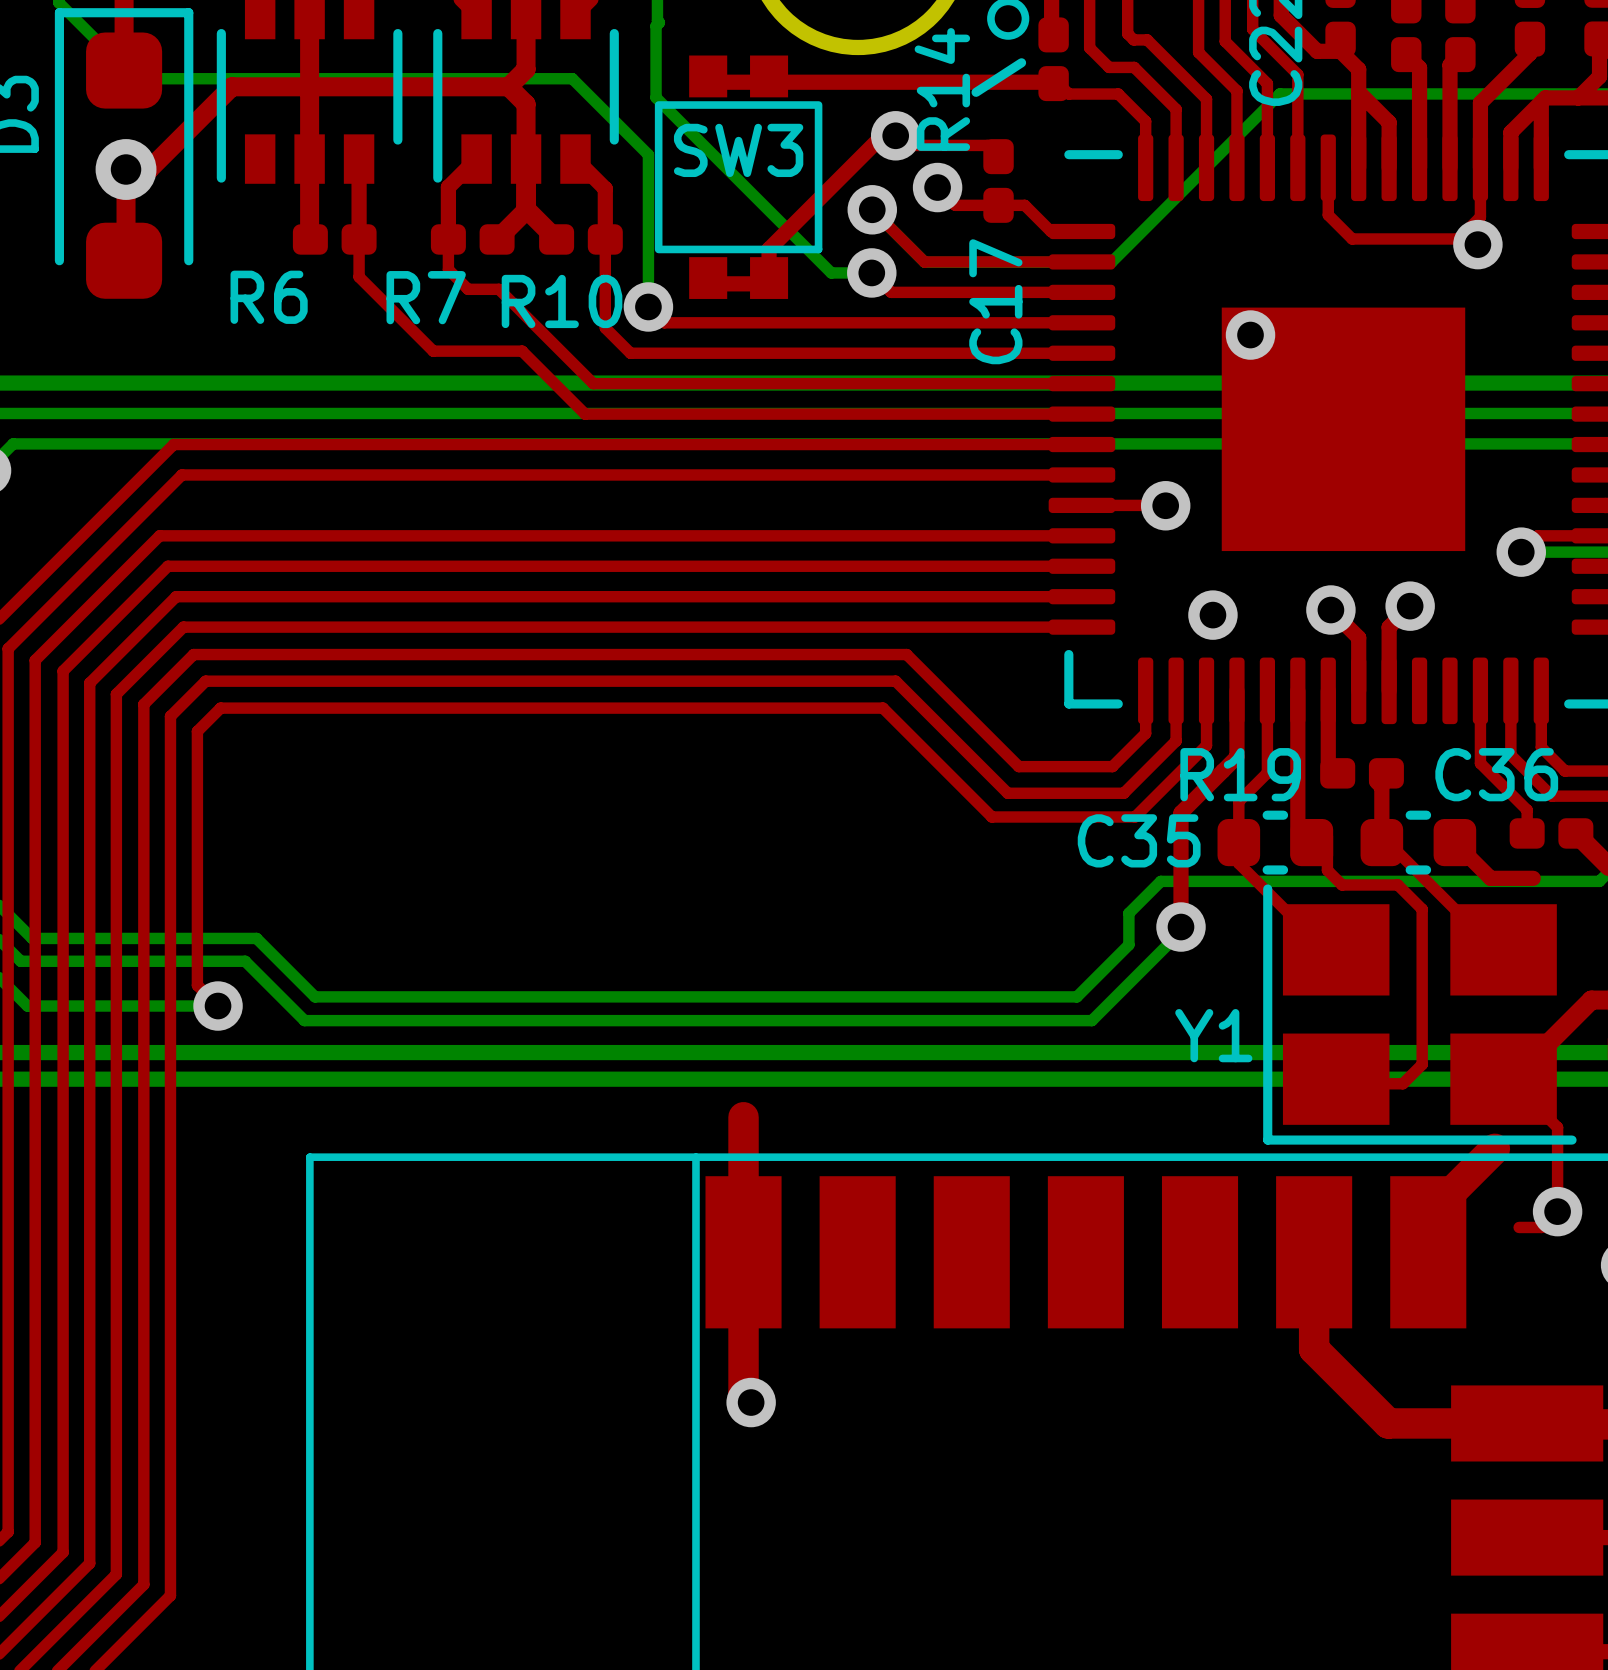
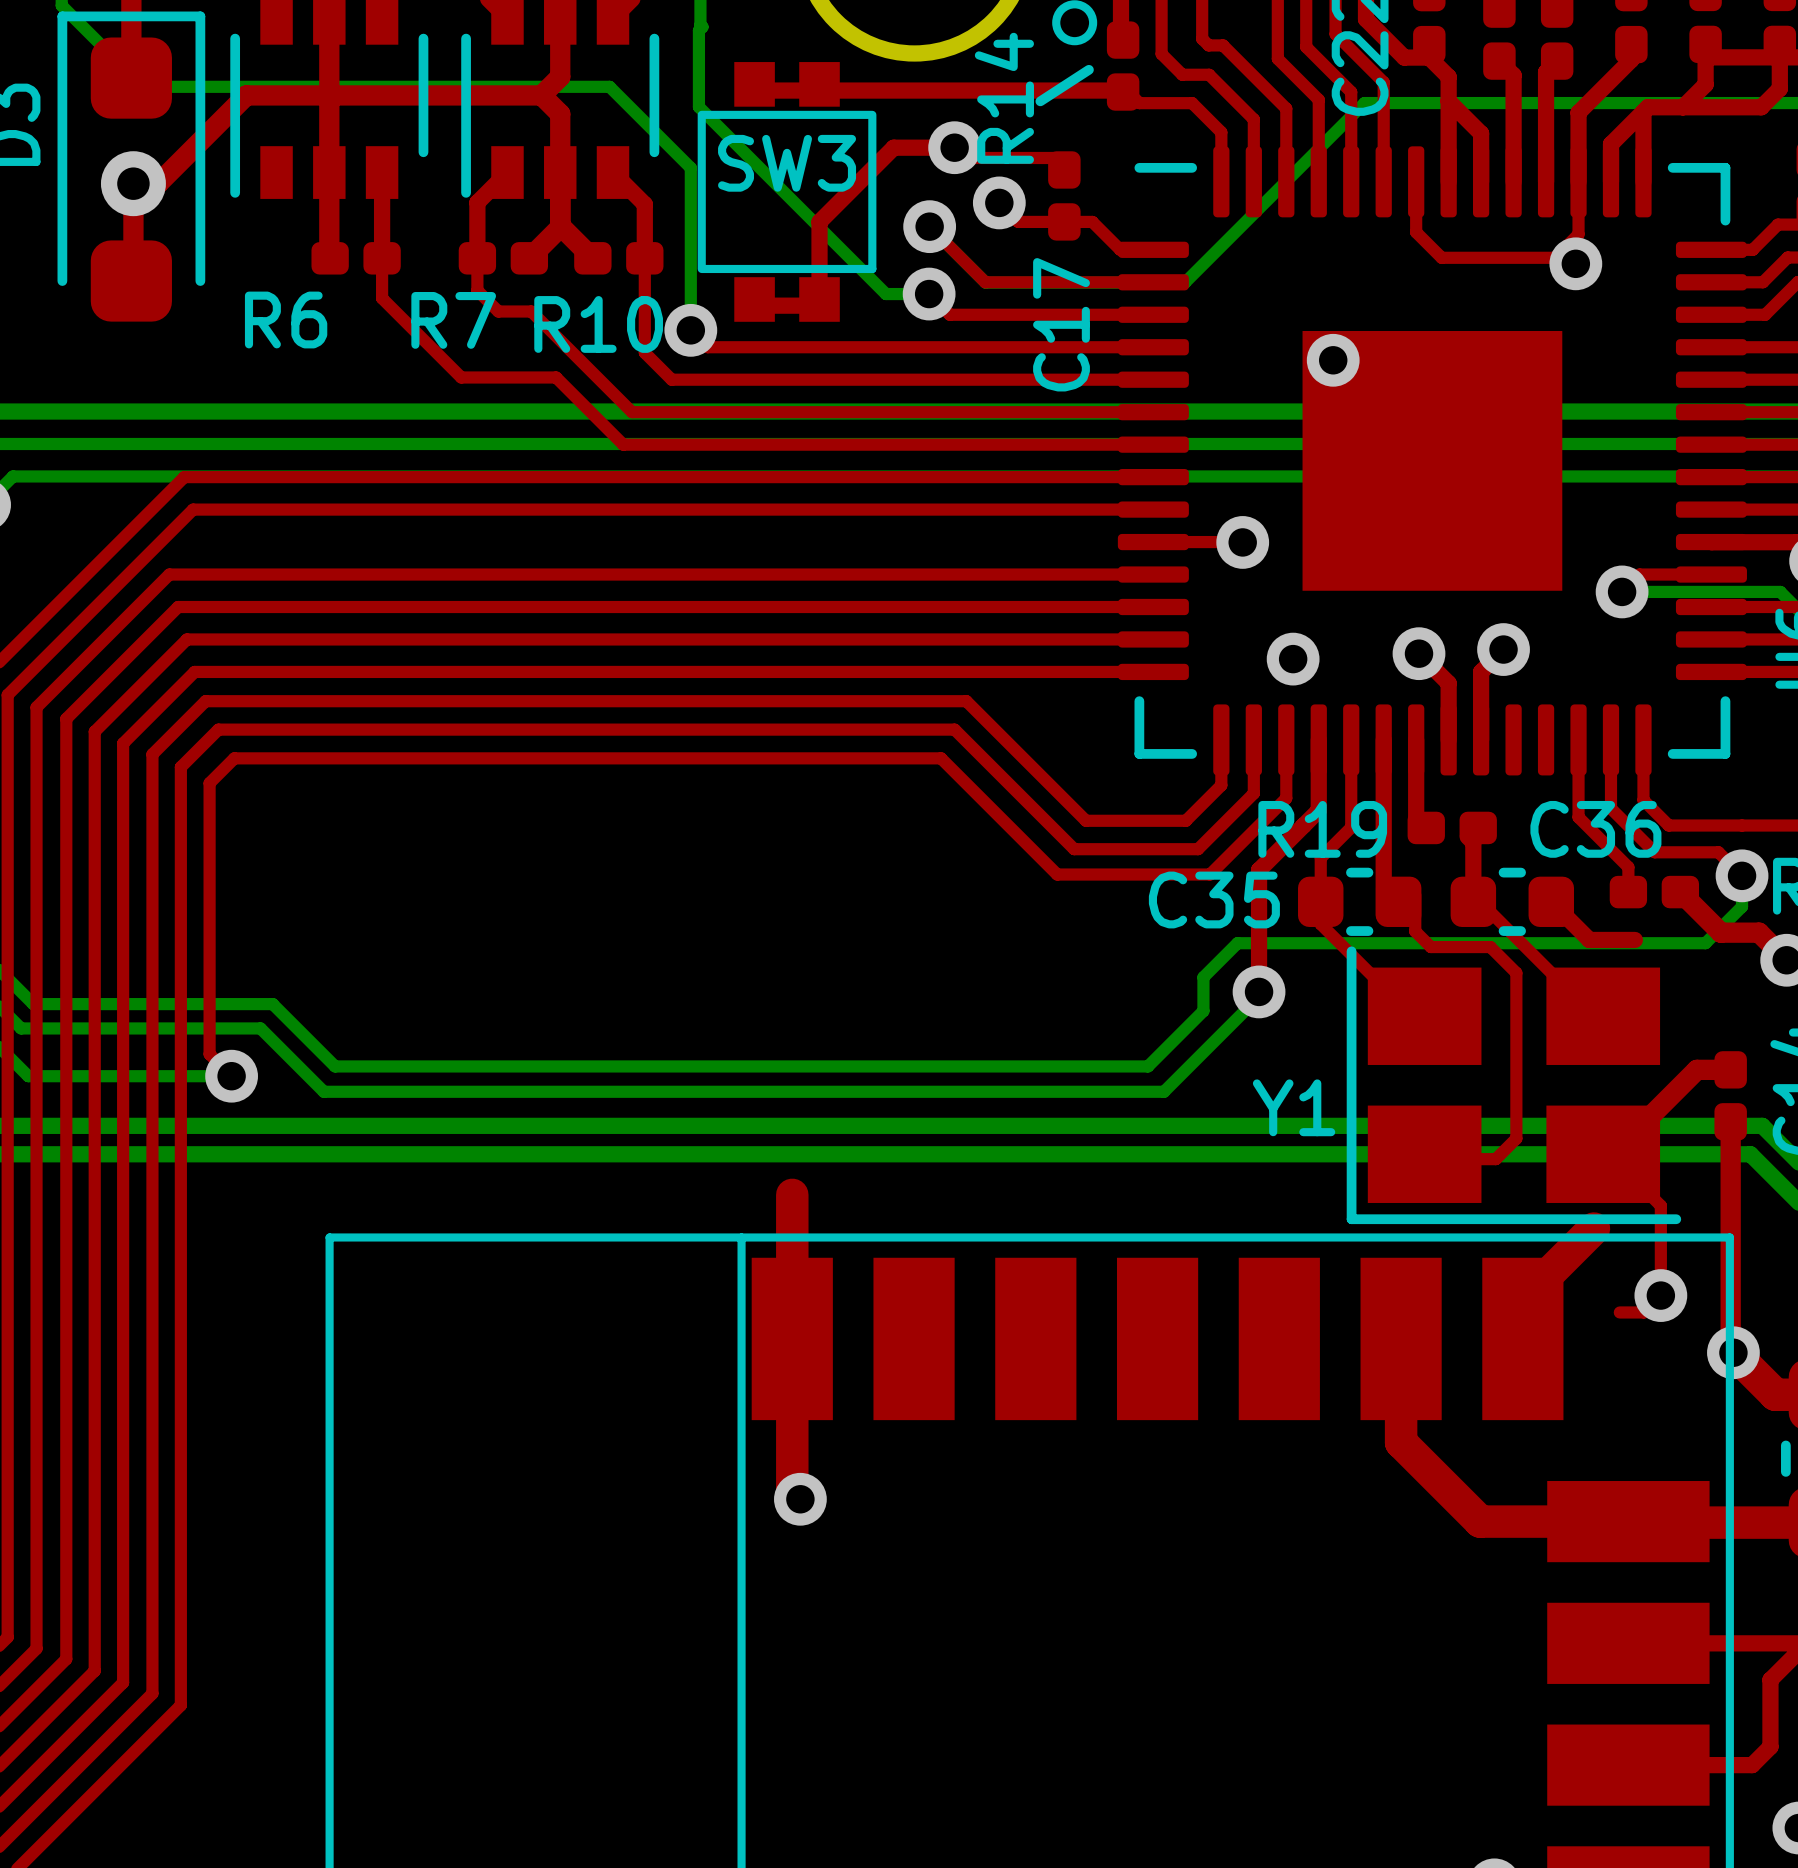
top track: (882, 135) (769, 249) -> (940, 147) (893, 147) (819, 221) (819, 268)

